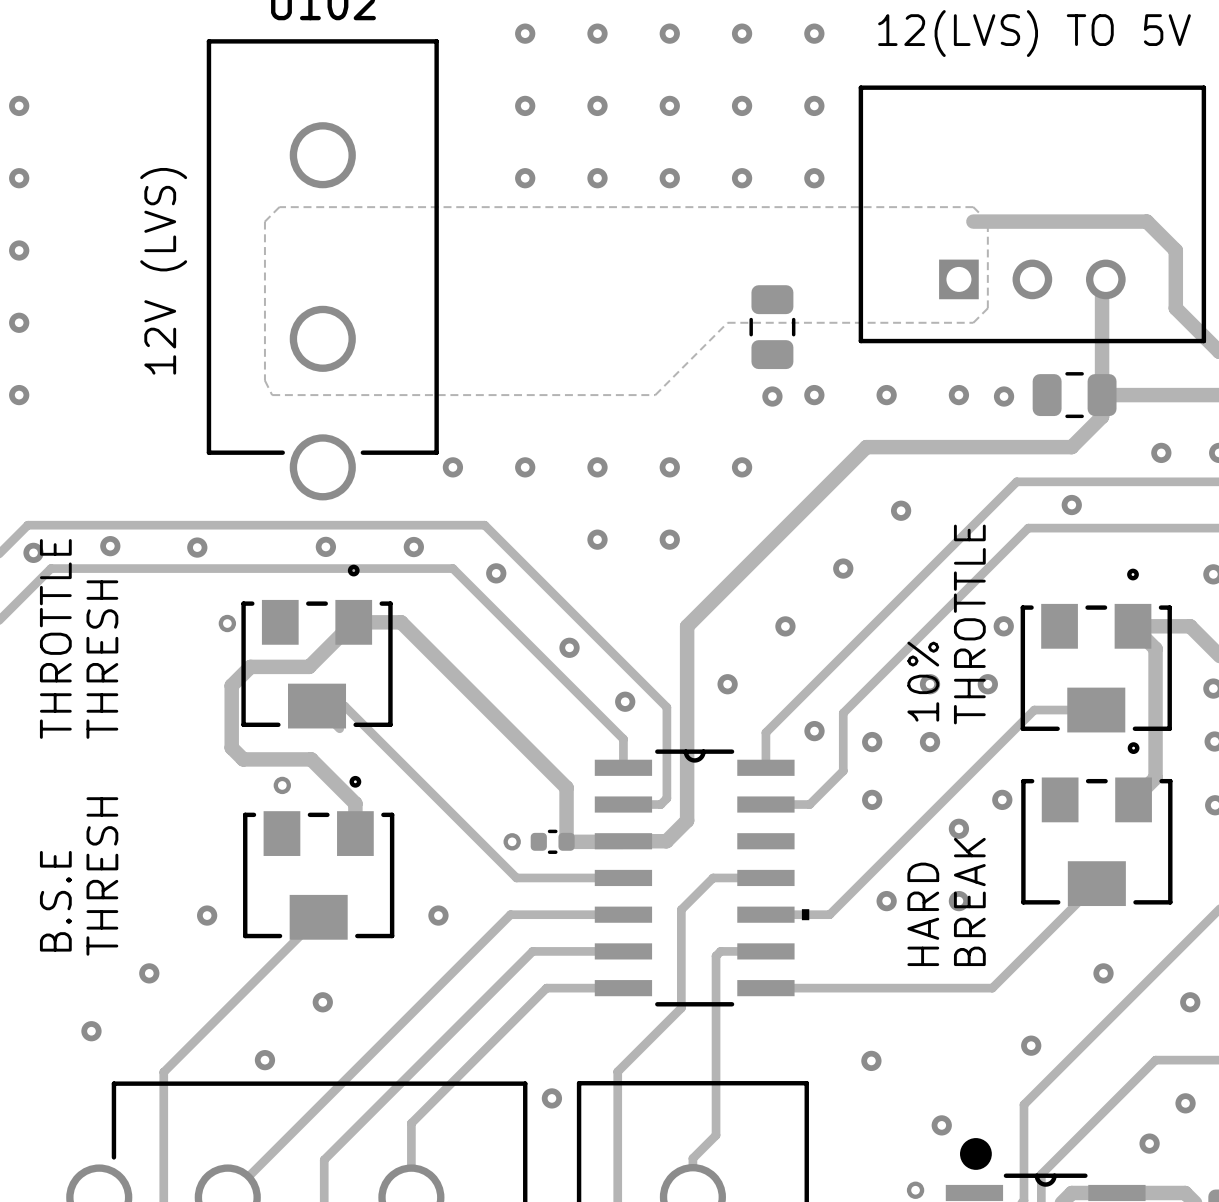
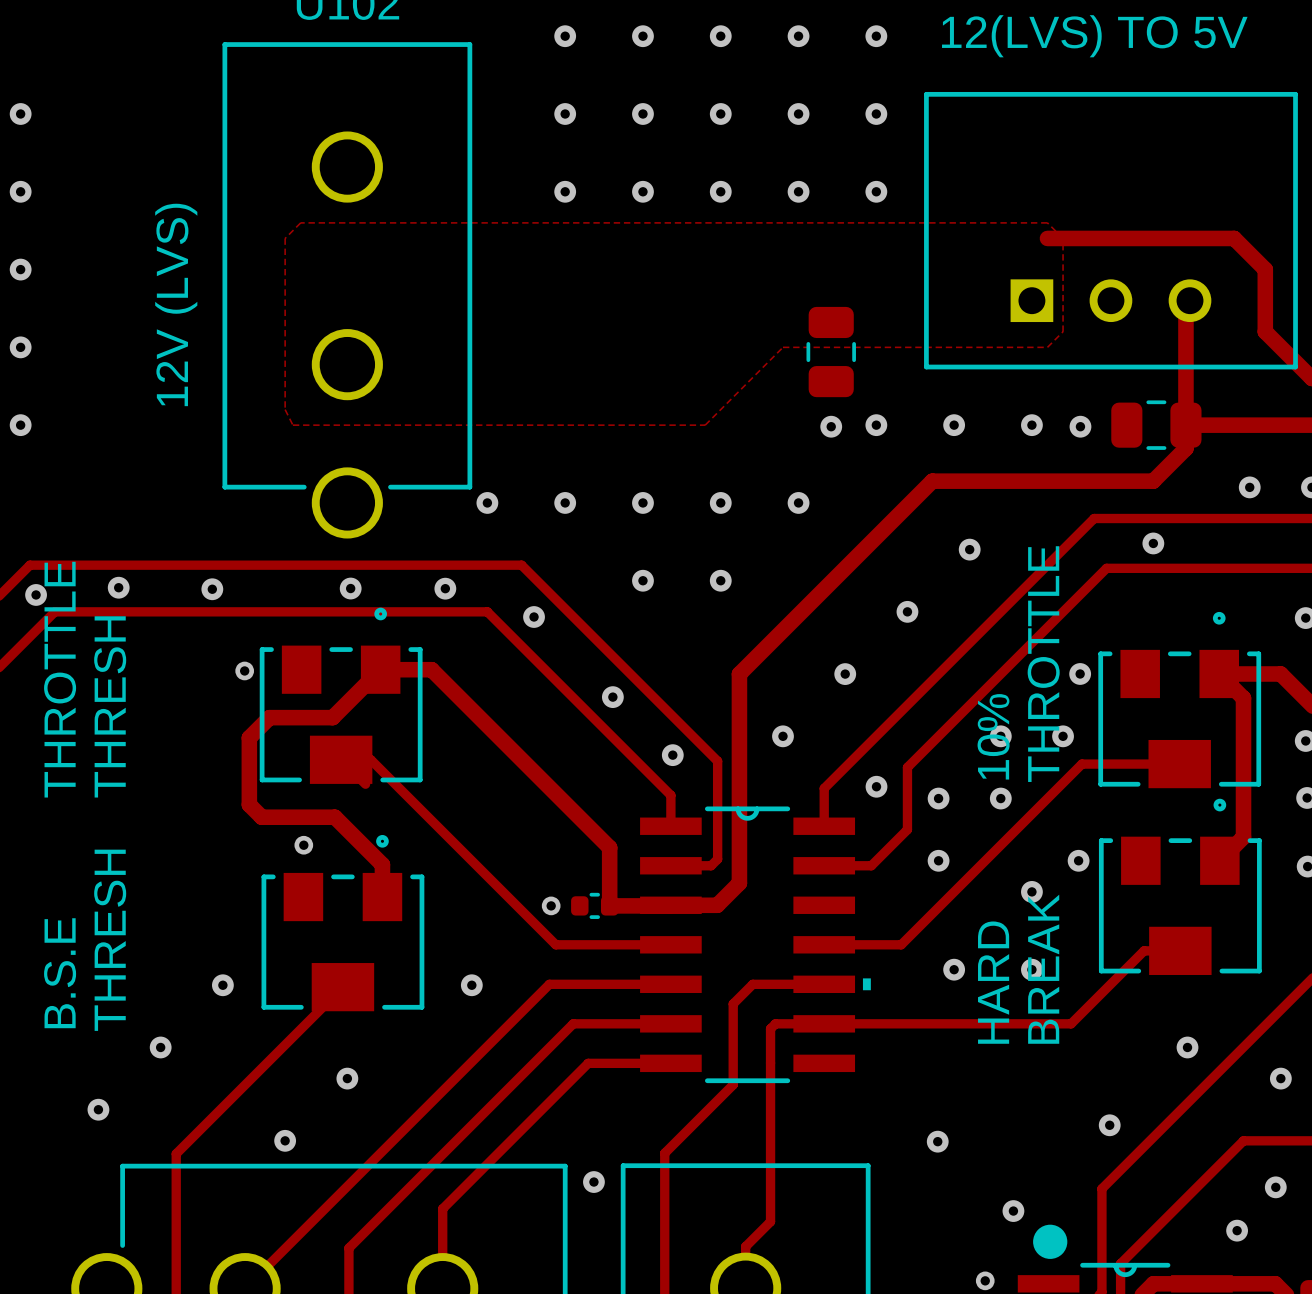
track: (1034, 710) (829, 914) (765, 914) -> (1113, 764) (1081, 764) (901, 944) (839, 944)
track: (765, 877) (713, 877) (681, 909) (681, 932) -> (824, 984) (752, 984) (733, 1003)
track: (1096, 883) (992, 988) (765, 988) -> (1180, 950) (1144, 950) (1071, 1023) (824, 1023)

